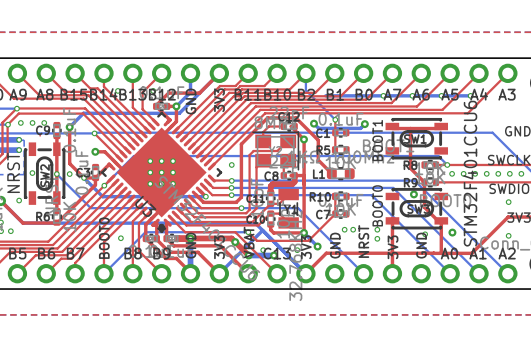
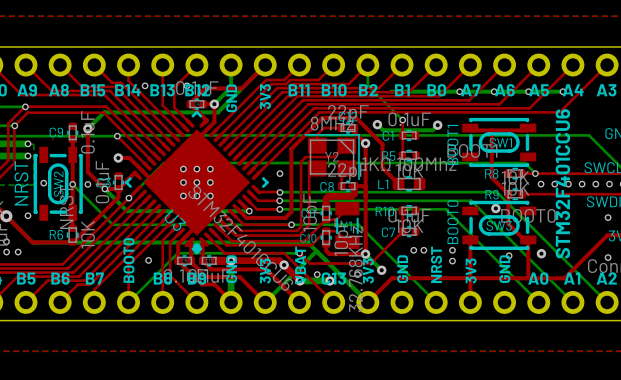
via: (20, 122) -> none
via: (32, 122) -> none
via: (44, 122) -> none

